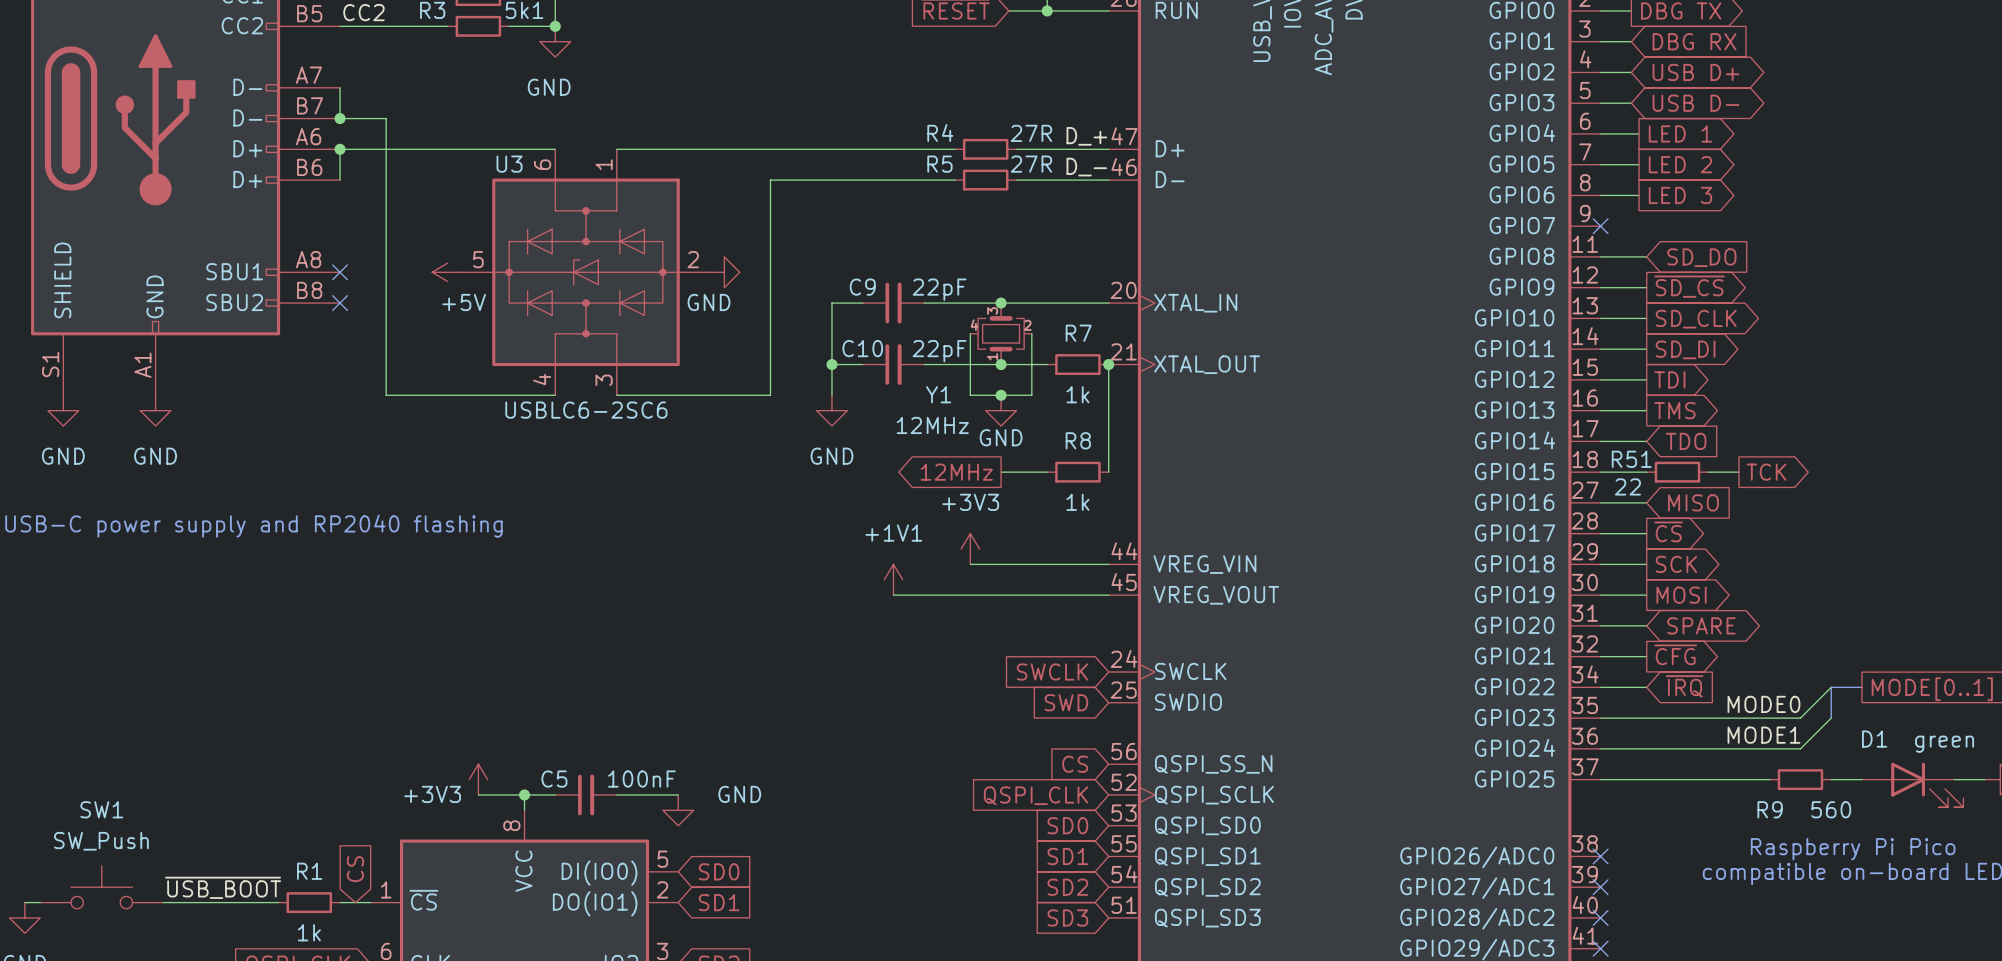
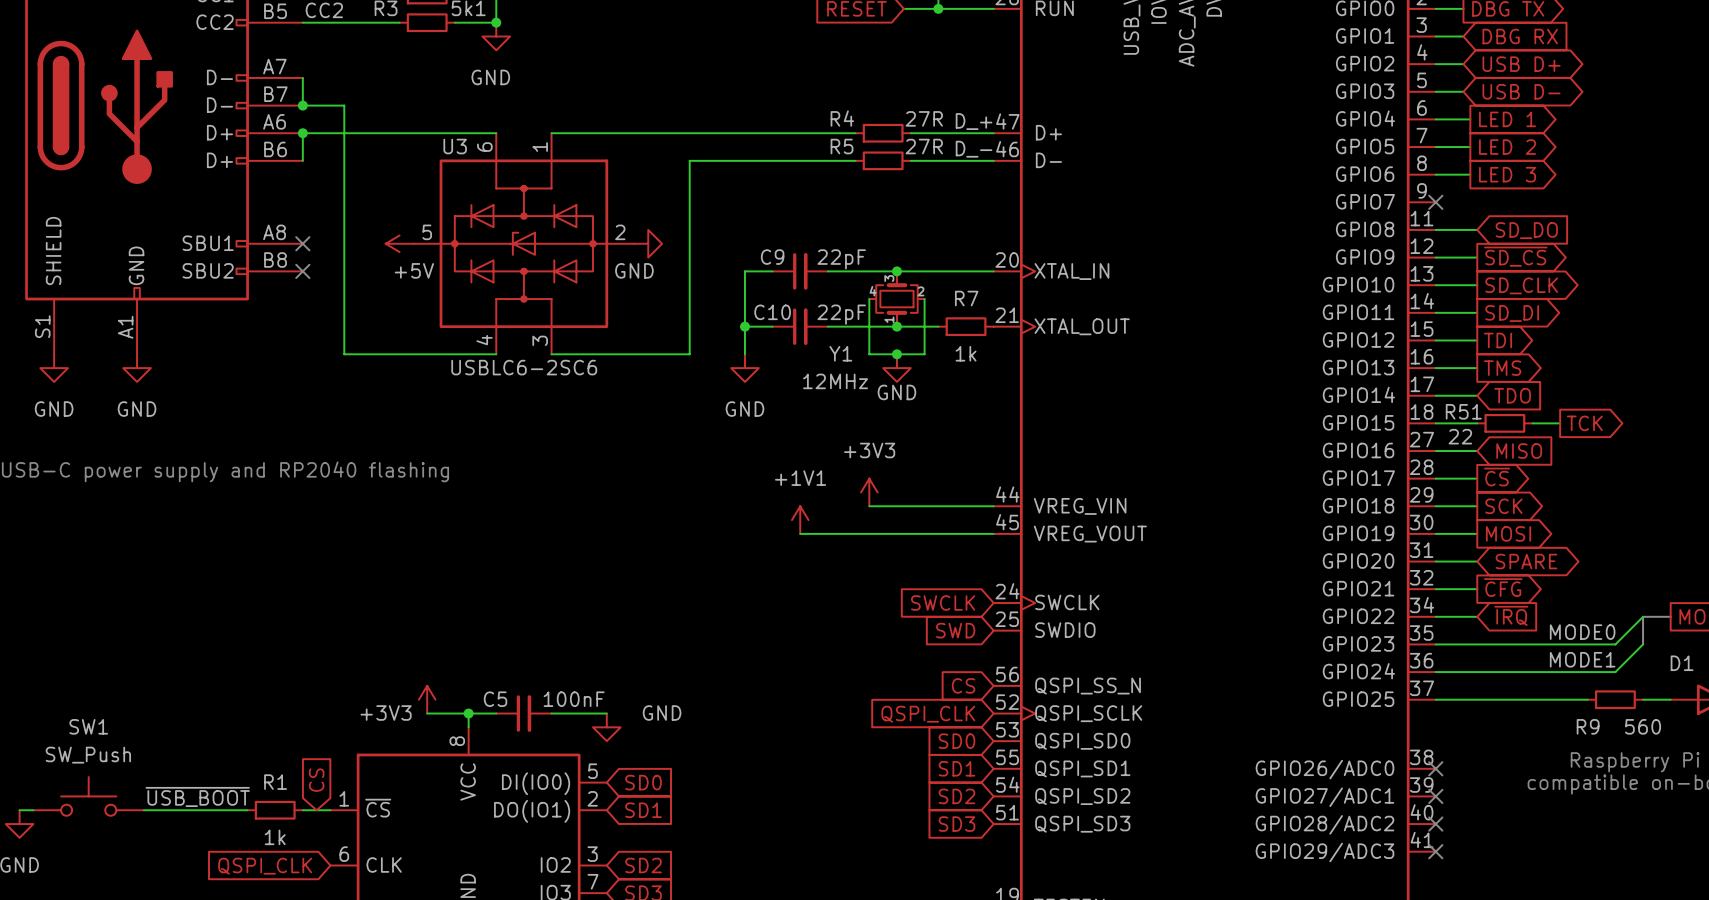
wire: (1108, 364) (1108, 472) -> none
junction: (1108, 364) -> none
global label: 12MHz (956, 472) -> none
wire: (1001, 472) (1047, 472) -> none
R8: 1k (1077, 472) -> none

